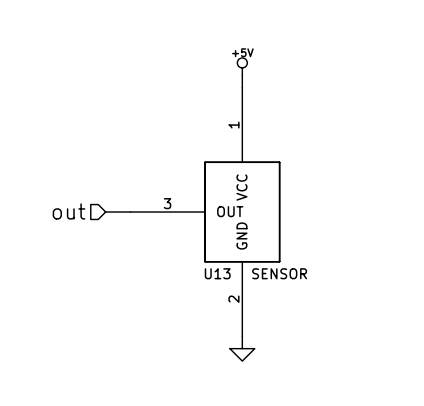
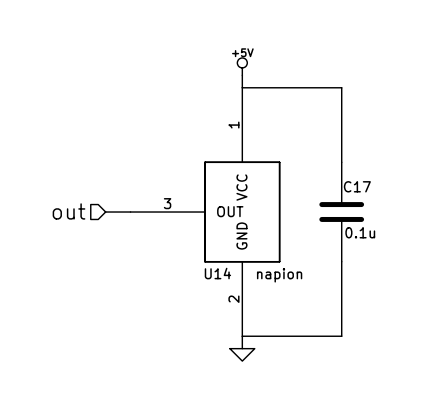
wire: none -> (242, 87) (341, 87) (341, 162)
C17: none -> 0.1u (341, 212)
wire: none -> (341, 261) (341, 336) (242, 336)
U13 name: U13 (217, 273) -> U14 (217, 273)
U13 value: SENSOR (279, 273) -> napion (279, 275)

